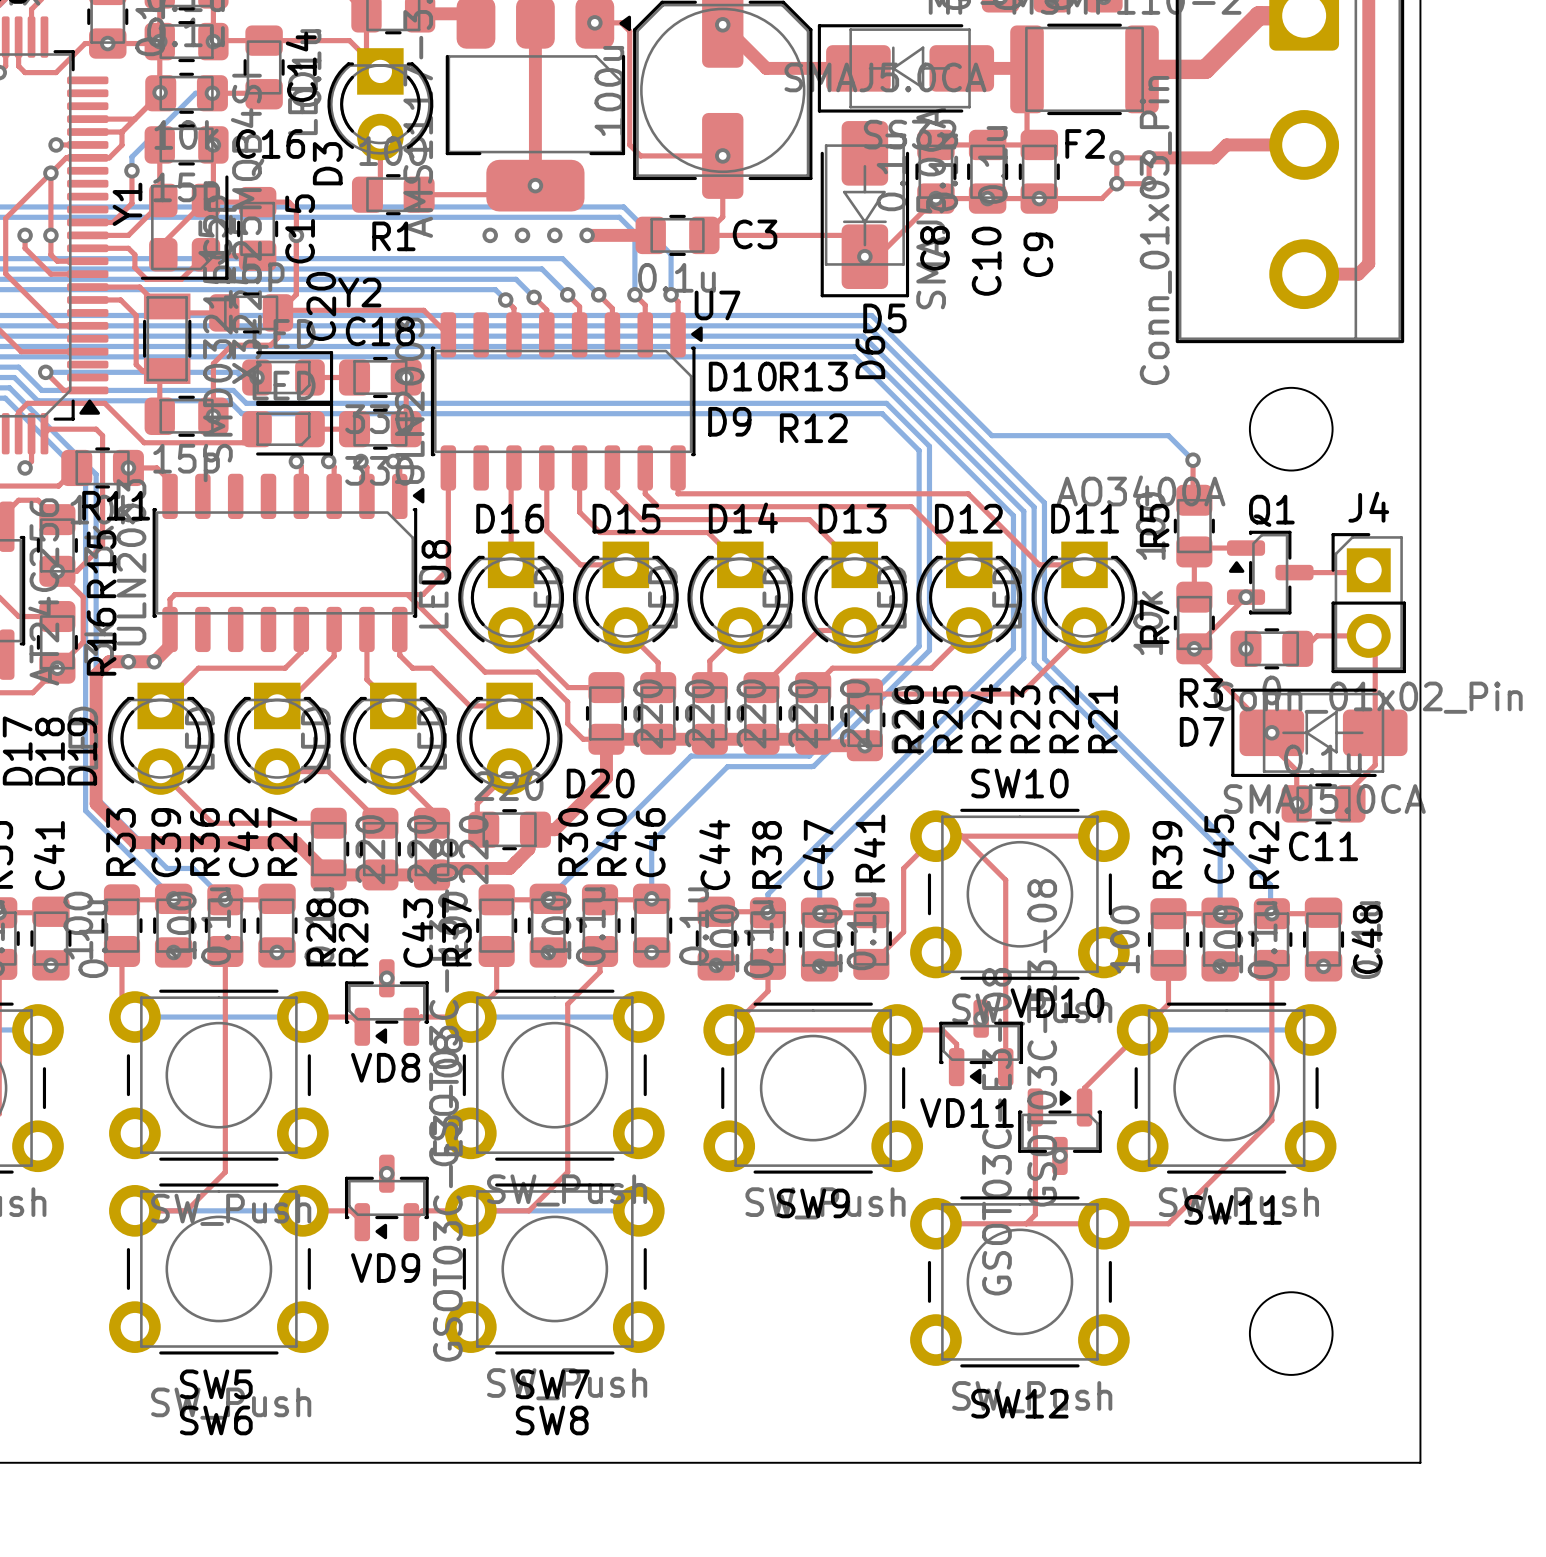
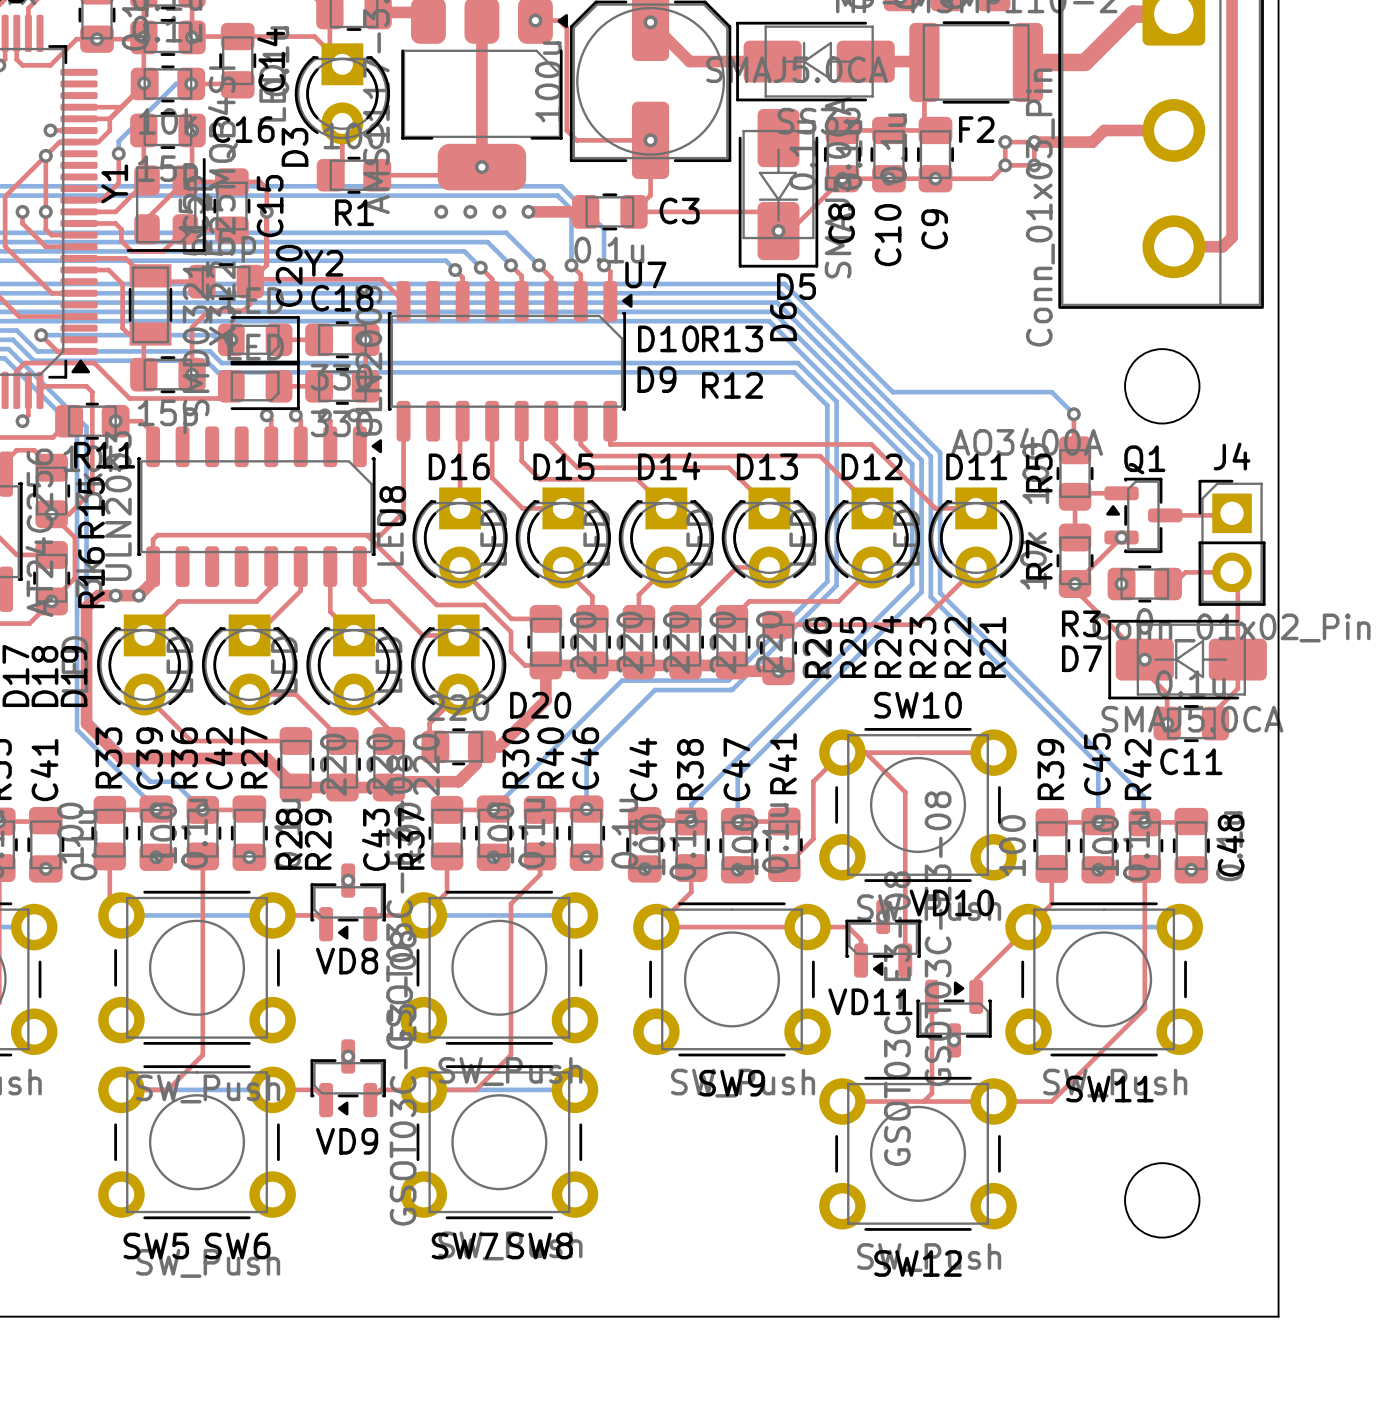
SW5 name position: SW5 (216, 1384) -> SW5 (156, 1246)
SW7 name position: SW7 (552, 1384) -> SW7 (465, 1246)
SW6 name position: SW6 (216, 1420) -> SW6 (237, 1246)
SW8 name position: SW8 (552, 1420) -> SW8 (540, 1246)

